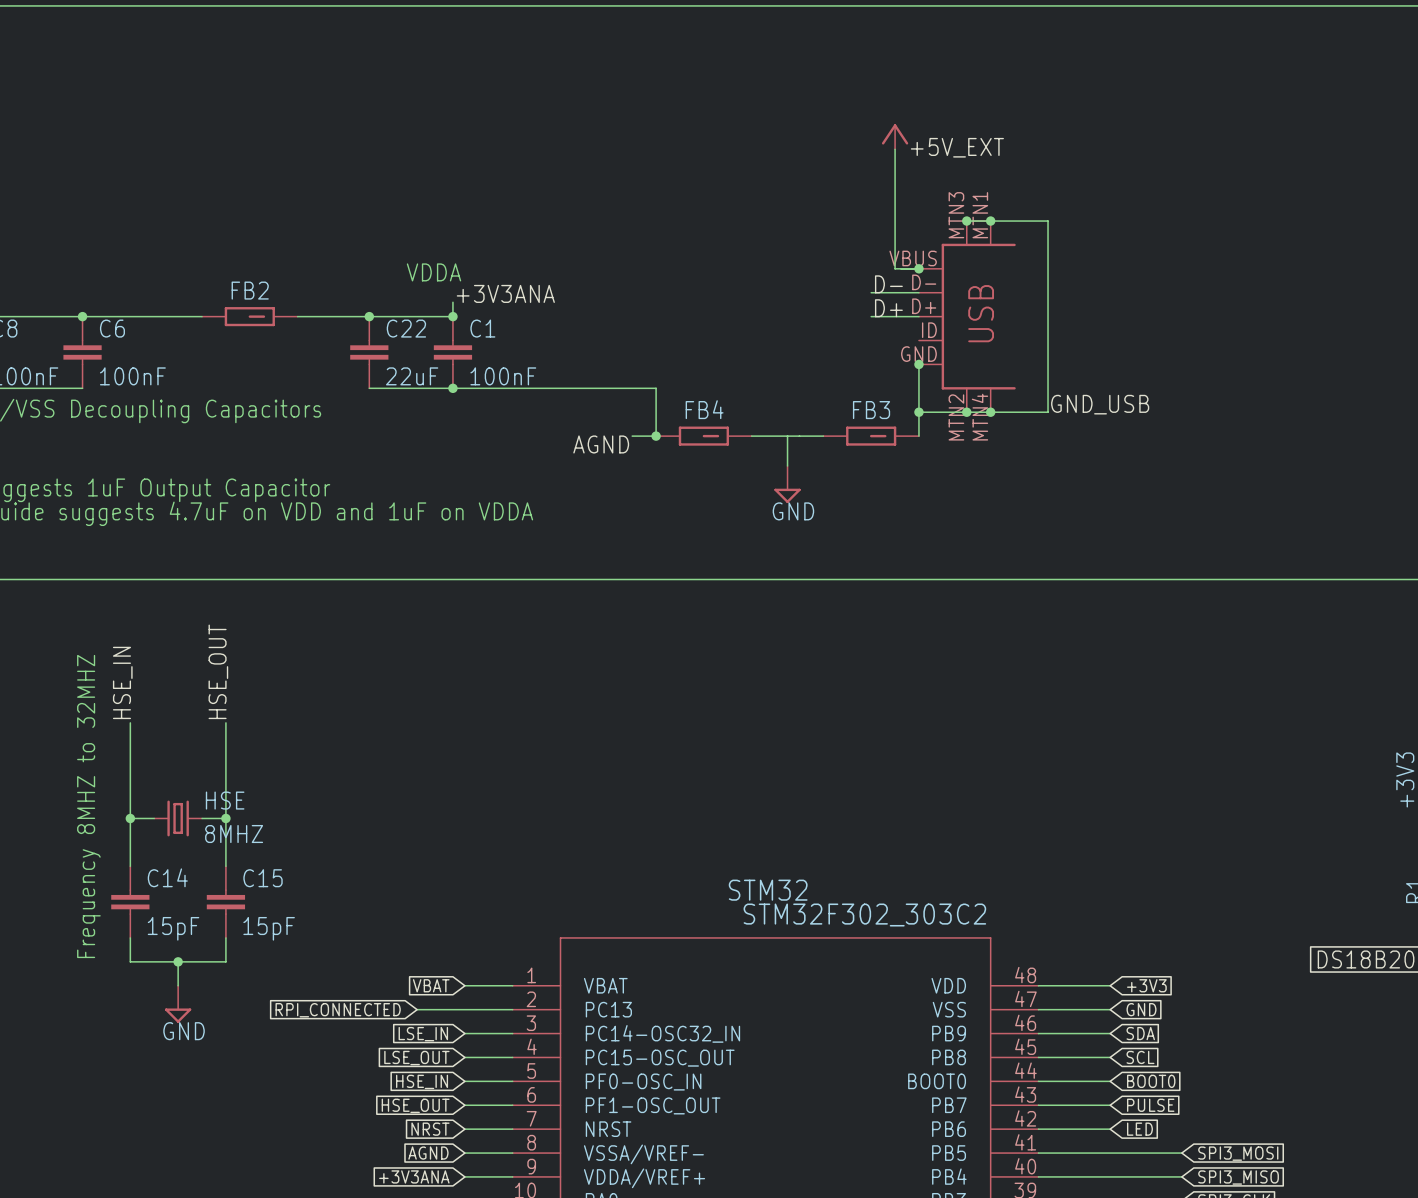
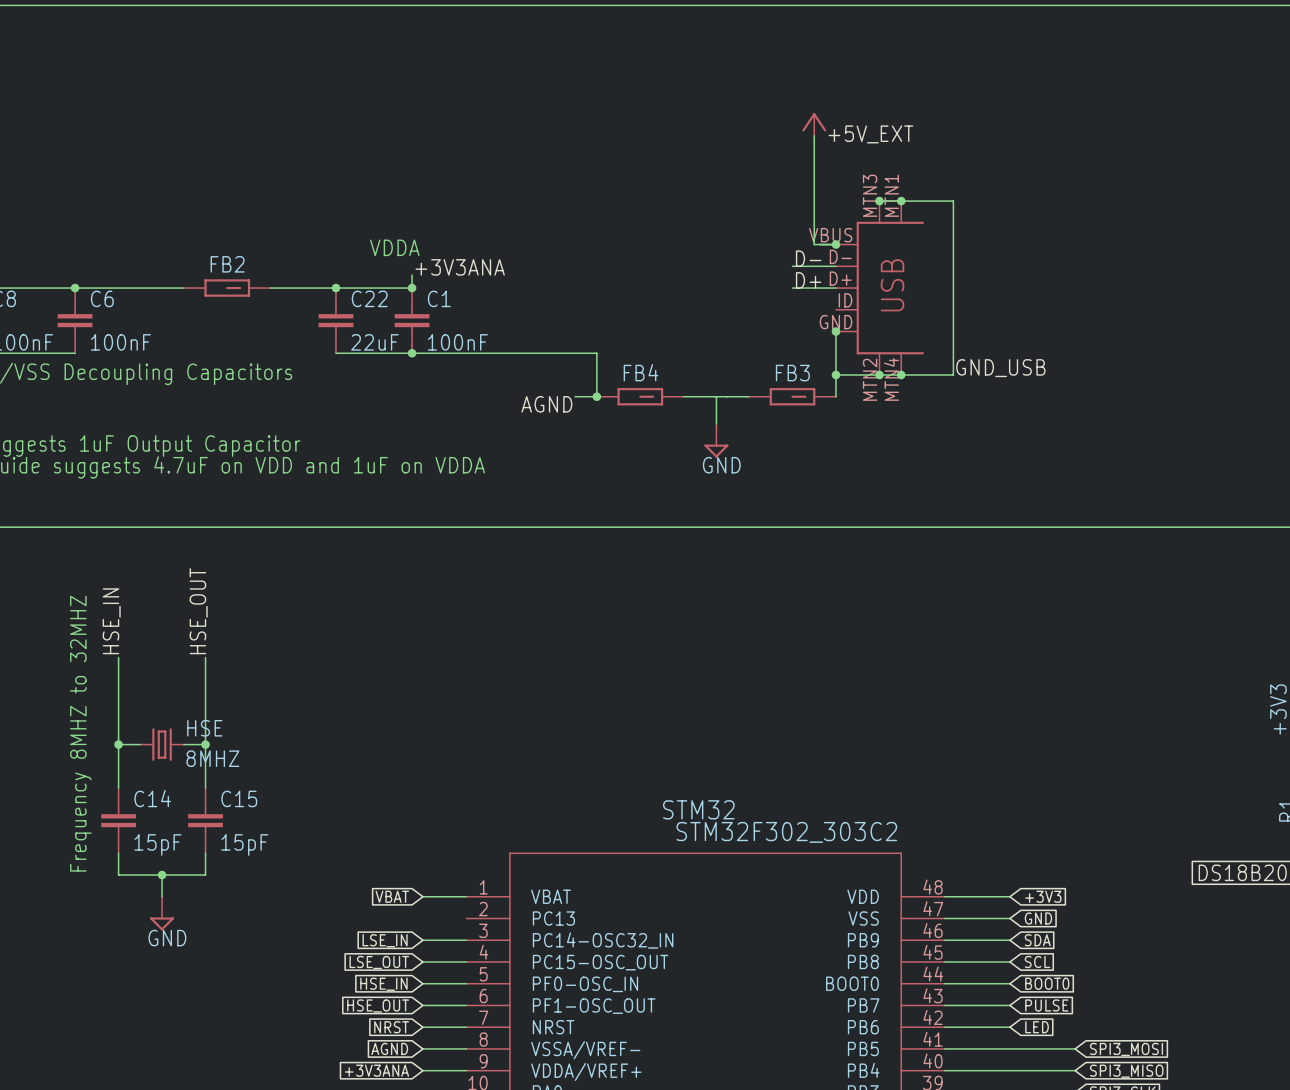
wire: (417, 1009) (512, 1009) -> none
global label: RPI_CONNECTED (338, 1010) -> none

